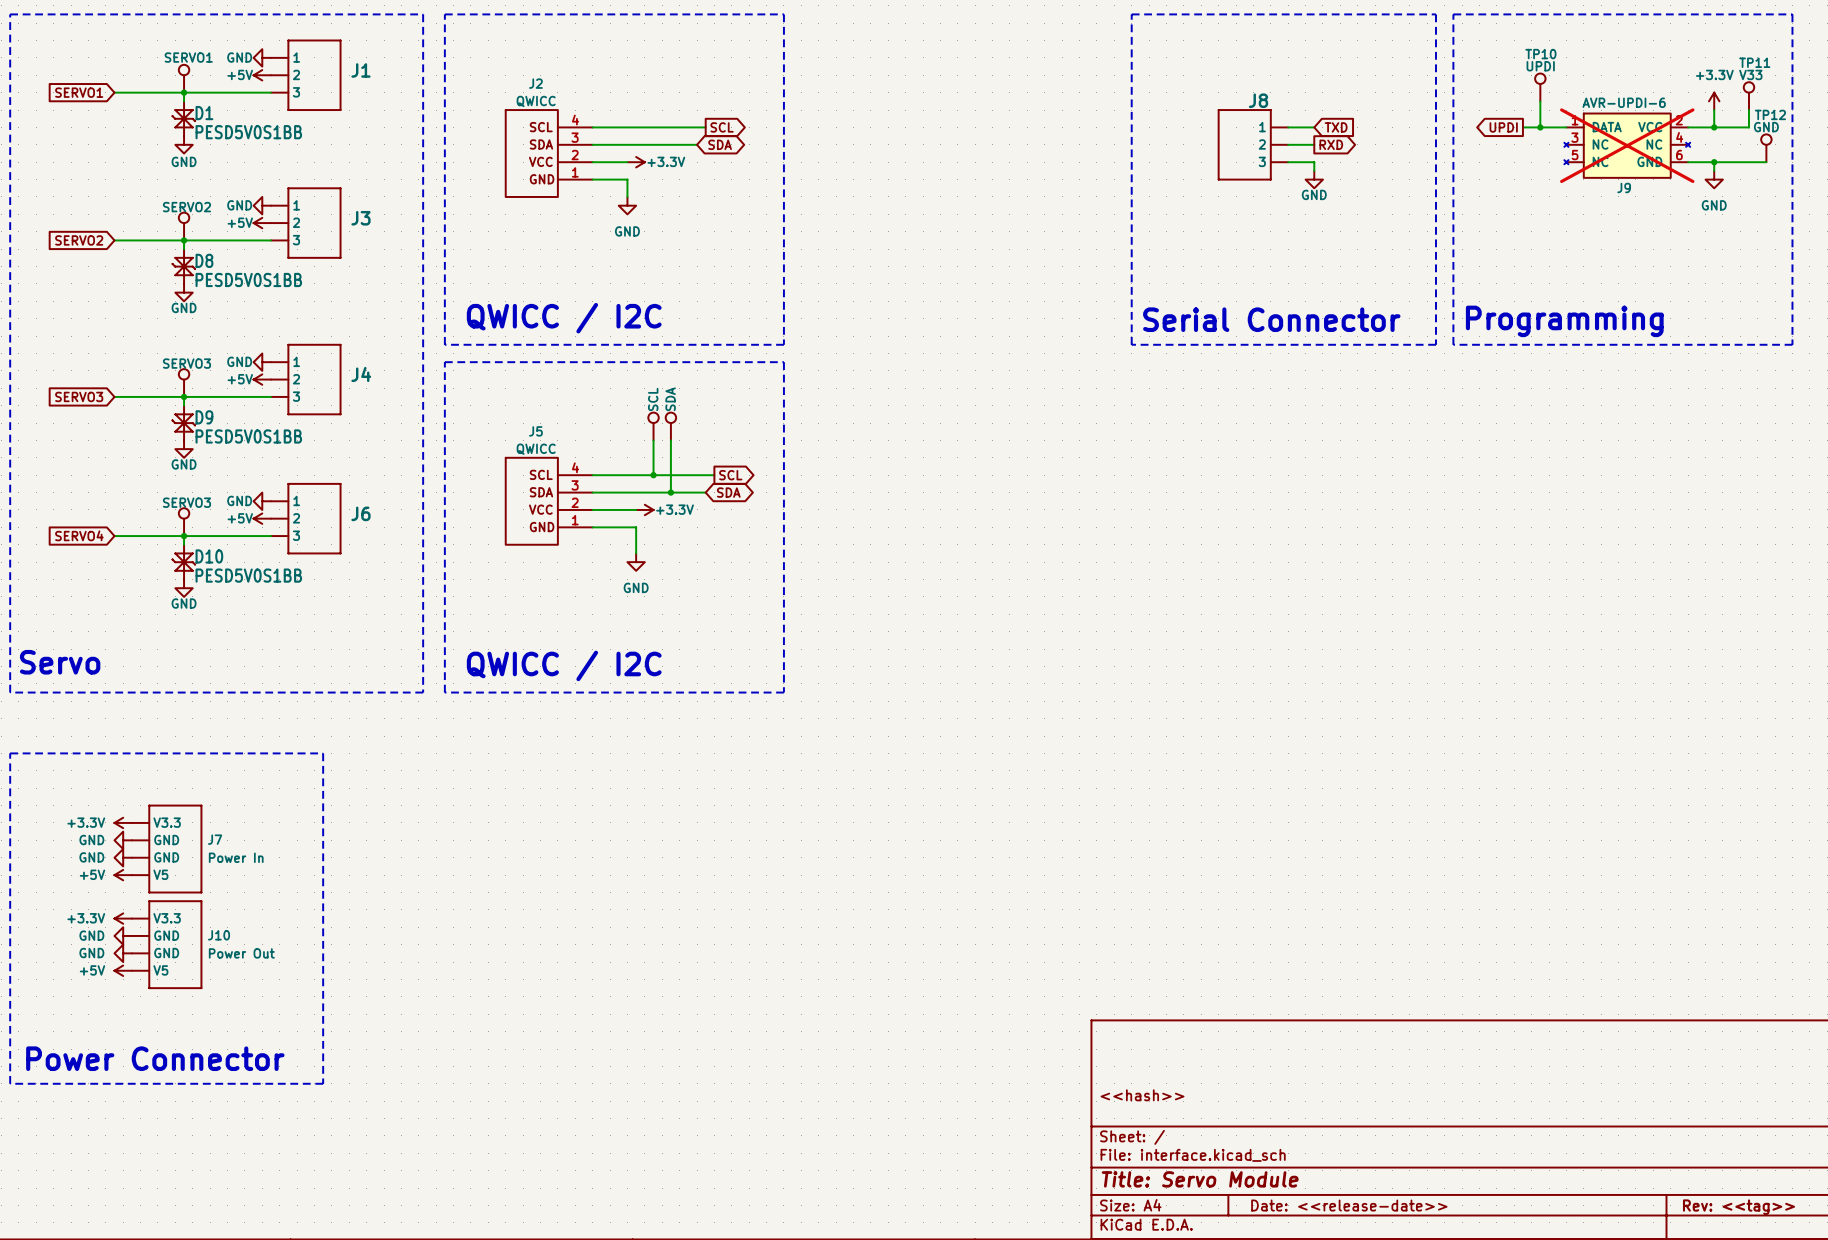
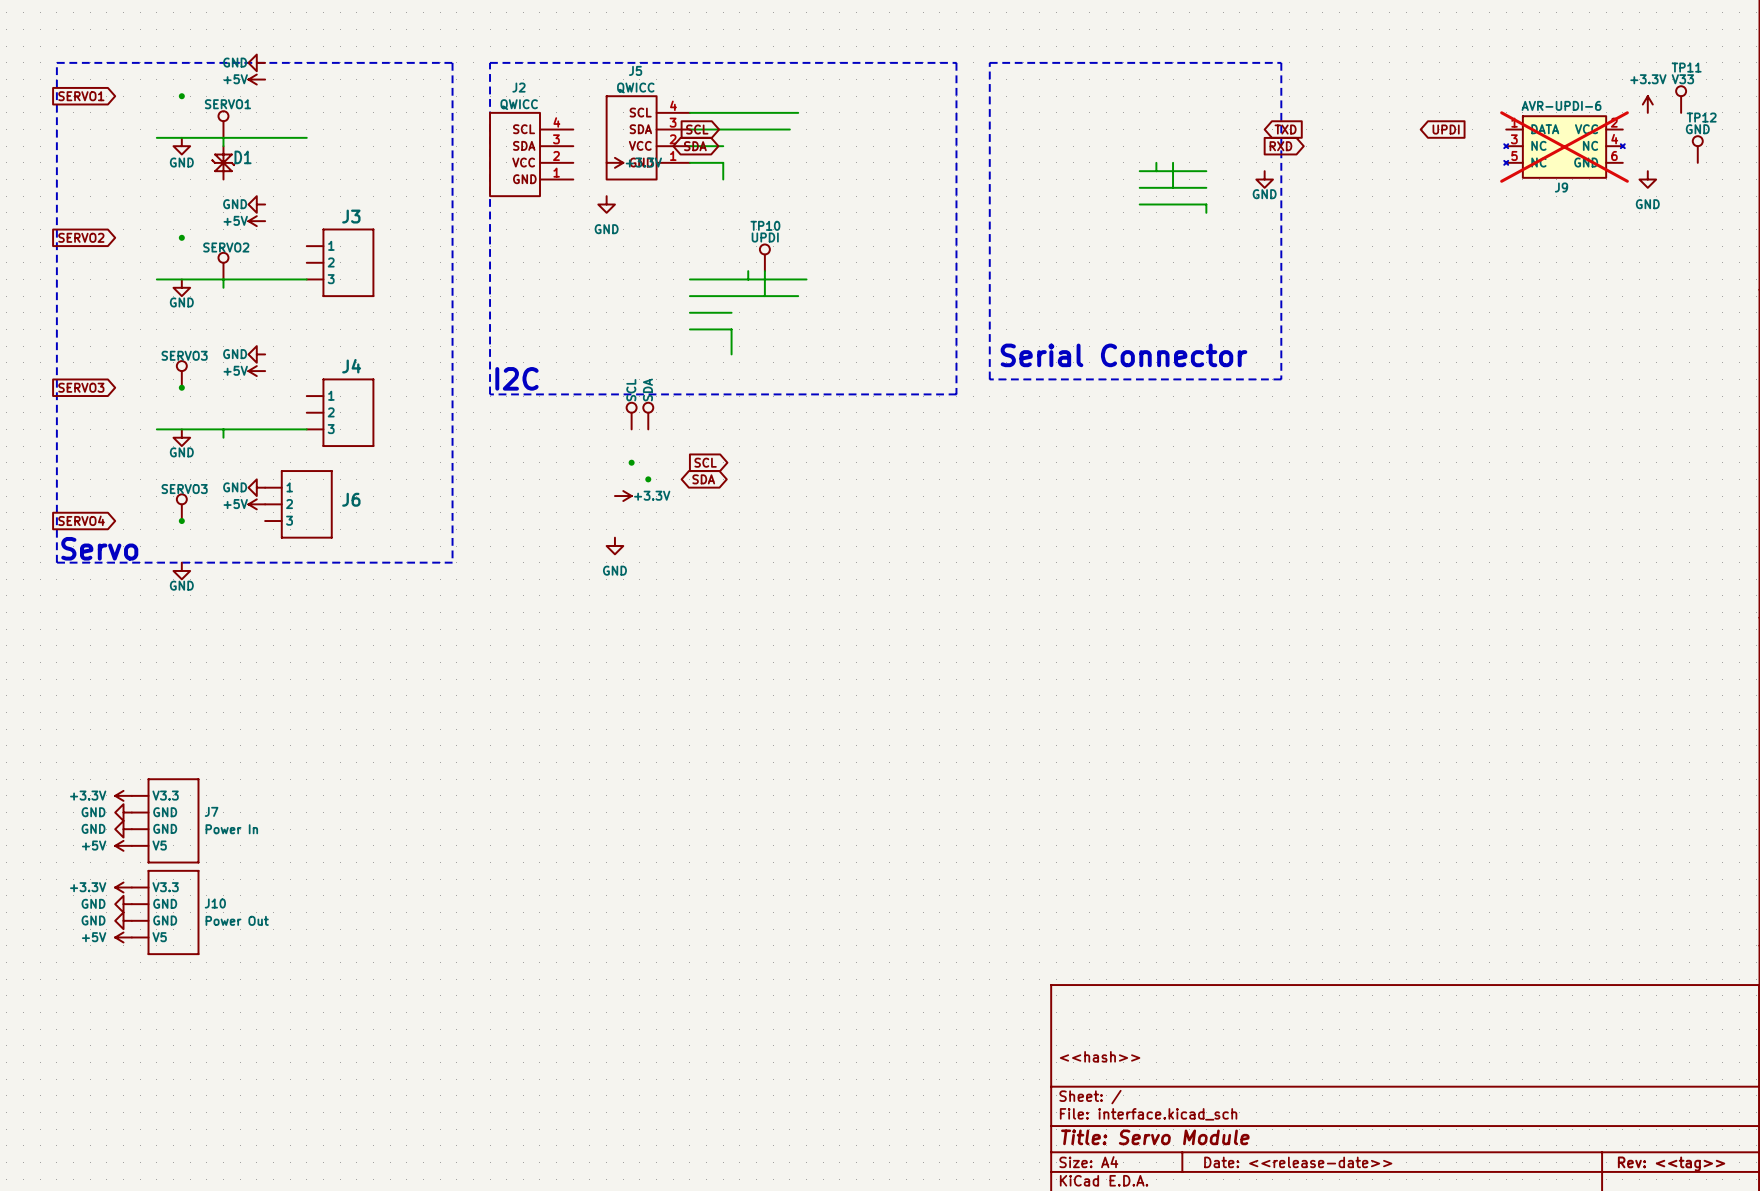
line: (10, 14) (423, 14) (423, 692) (10, 692) (10, 14) -> (56, 62) (56, 562) (452, 562) (452, 62) (56, 62)
line: (444, 14) (783, 14) (783, 344) (444, 344) (444, 14) -> none
line: (1131, 14) (1436, 14) (1436, 344) (1131, 344) (1131, 14) -> (989, 62) (1281, 62) (1281, 379) (989, 379) (989, 62)
line: (1453, 14) (1792, 14) (1792, 344) (1453, 344) (1453, 14) -> none
line: none -> (490, 62) (956, 62) (956, 394) (490, 394) (490, 62)
J1: (306, 75) -> none
part position: (184, 78) -> (223, 124)
TP10 position: (1540, 87) -> (764, 257)
wire: (114, 92) (270, 92) -> (156, 137) (306, 137)
wire: (184, 92) (184, 101) -> (223, 137) (223, 146)
wire: (1540, 101) (1540, 127) -> none
wire: (1714, 110) (1714, 127) -> none
wire: (1748, 110) (1748, 127) (1688, 127) -> none
D1 position: (183, 118) -> (223, 162)
wire: (592, 127) (705, 127) -> (689, 112) (798, 112)
wire: (1288, 127) (1314, 127) -> none
wire: (1522, 127) (1566, 127) -> none
junction: (1540, 127) -> none
junction: (1714, 127) -> none
D1 value: PESD5V0S1BB (248, 132) -> none
wire: (592, 144) (697, 144) -> (689, 129) (789, 129)
J8: (1252, 144) -> none
wire: (1288, 144) (1314, 144) -> none
wire: (592, 162) (627, 162) -> (689, 146) (723, 146)
wire: none -> (1156, 162) (1156, 171)
wire: (1288, 162) (1314, 162) (1314, 170) -> none
wire: (1688, 162) (1766, 162) -> none
wire: (1714, 162) (1714, 170) -> none
junction: (1714, 162) -> none
wire: none -> (1139, 171) (1206, 171)
wire: (592, 179) (627, 179) (627, 196) -> (689, 162) (723, 162) (723, 179)
wire: none -> (1139, 187) (1206, 187)
wire: none -> (1139, 204) (1206, 204) (1206, 212)
J3 position: (306, 223) -> (340, 262)
part position: (184, 226) -> (223, 266)
wire: (114, 240) (270, 240) -> (156, 279) (306, 279)
wire: (184, 240) (184, 249) -> (223, 279) (223, 287)
D8: PESD5V0S1BB (183, 266) -> none
wire: none -> (748, 271) (748, 279)
wire: none -> (764, 271) (764, 296)
wire: none -> (689, 279) (806, 279)
wire: none -> (689, 296) (798, 296)
text: QWICC / I2C (564, 318) -> none
wire: none -> (689, 312) (731, 312)
text position: Serial Connector (1271, 319) -> Serial Connector (1123, 355)
text: Programming (1564, 321) -> none
wire: none -> (689, 329) (731, 329) (731, 354)
line: (444, 362) (444, 692) (783, 692) (783, 362) (444, 362) -> none
J4 position: (306, 379) -> (340, 412)
text: none -> I2C (516, 378)
wire: (114, 396) (270, 396) -> (156, 429) (306, 429)
wire: (184, 396) (184, 405) -> (223, 429) (223, 437)
D9: PESD5V0S1BB (183, 423) -> none
wire: (653, 440) (653, 475) -> none
wire: (670, 440) (670, 492) -> none
wire: (592, 475) (714, 475) -> none
wire: (592, 492) (705, 492) -> none
J5 position: (549, 501) -> (648, 137)
wire: (592, 509) (636, 509) -> none
wire: (592, 527) (636, 527) (636, 553) -> none
wire: (114, 536) (270, 536) -> none
wire: (184, 536) (184, 544) -> none
D10: PESD5V0S1BB (183, 562) -> none
text position: Servo (60, 662) -> Servo (99, 548)
text: QWICC / I2C (564, 665) -> none
line: (10, 753) (323, 753) (323, 1083) (10, 1083) (10, 753) -> none
text: Power Connector (155, 1058) -> none

